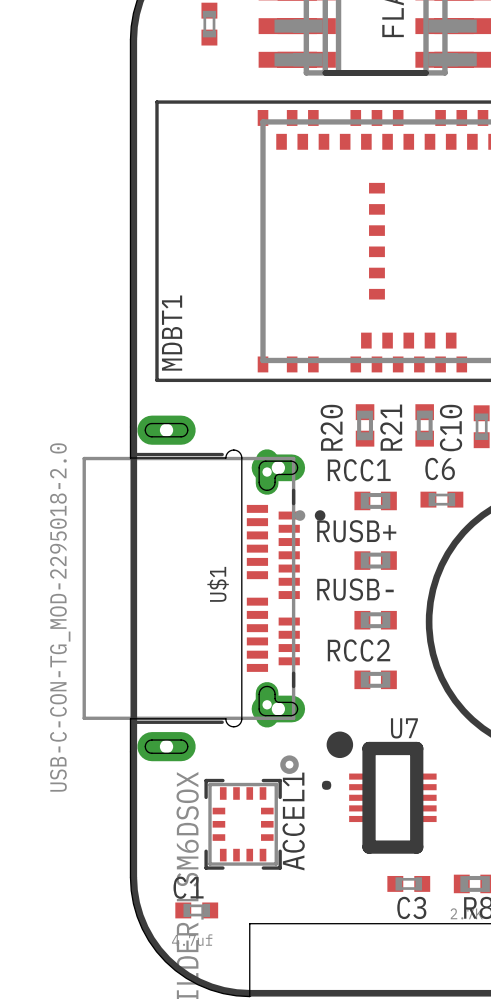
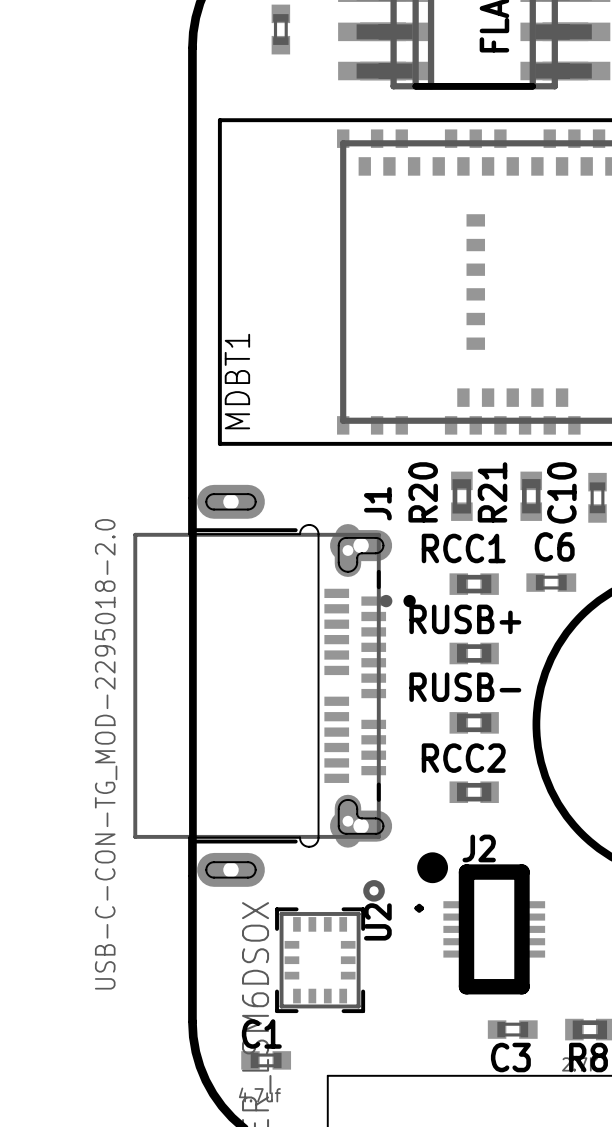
U$1 name: U$1 (218, 584) -> J1 (377, 503)
text: U7 (404, 728) -> J2 (479, 848)
ACCEL1 name: ACCEL1 (293, 821) -> U2 (377, 921)

